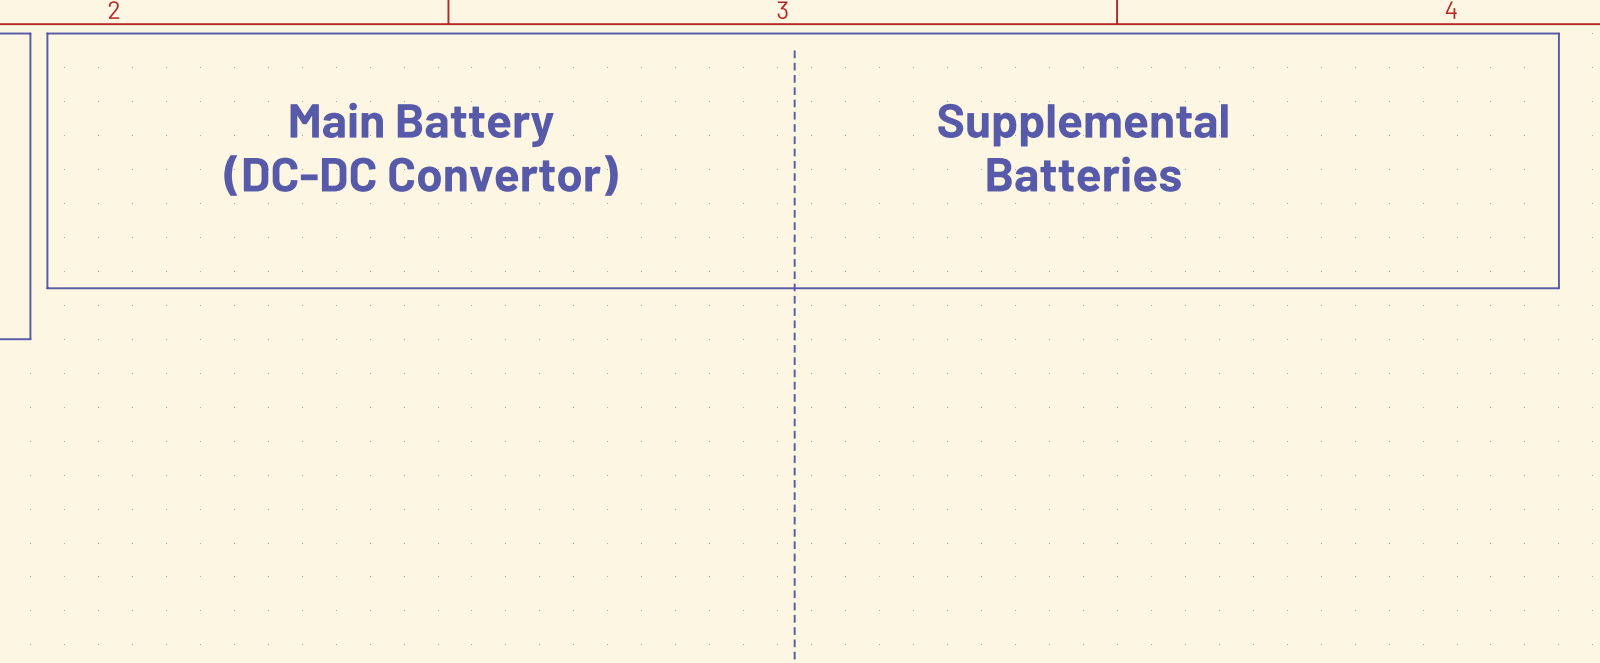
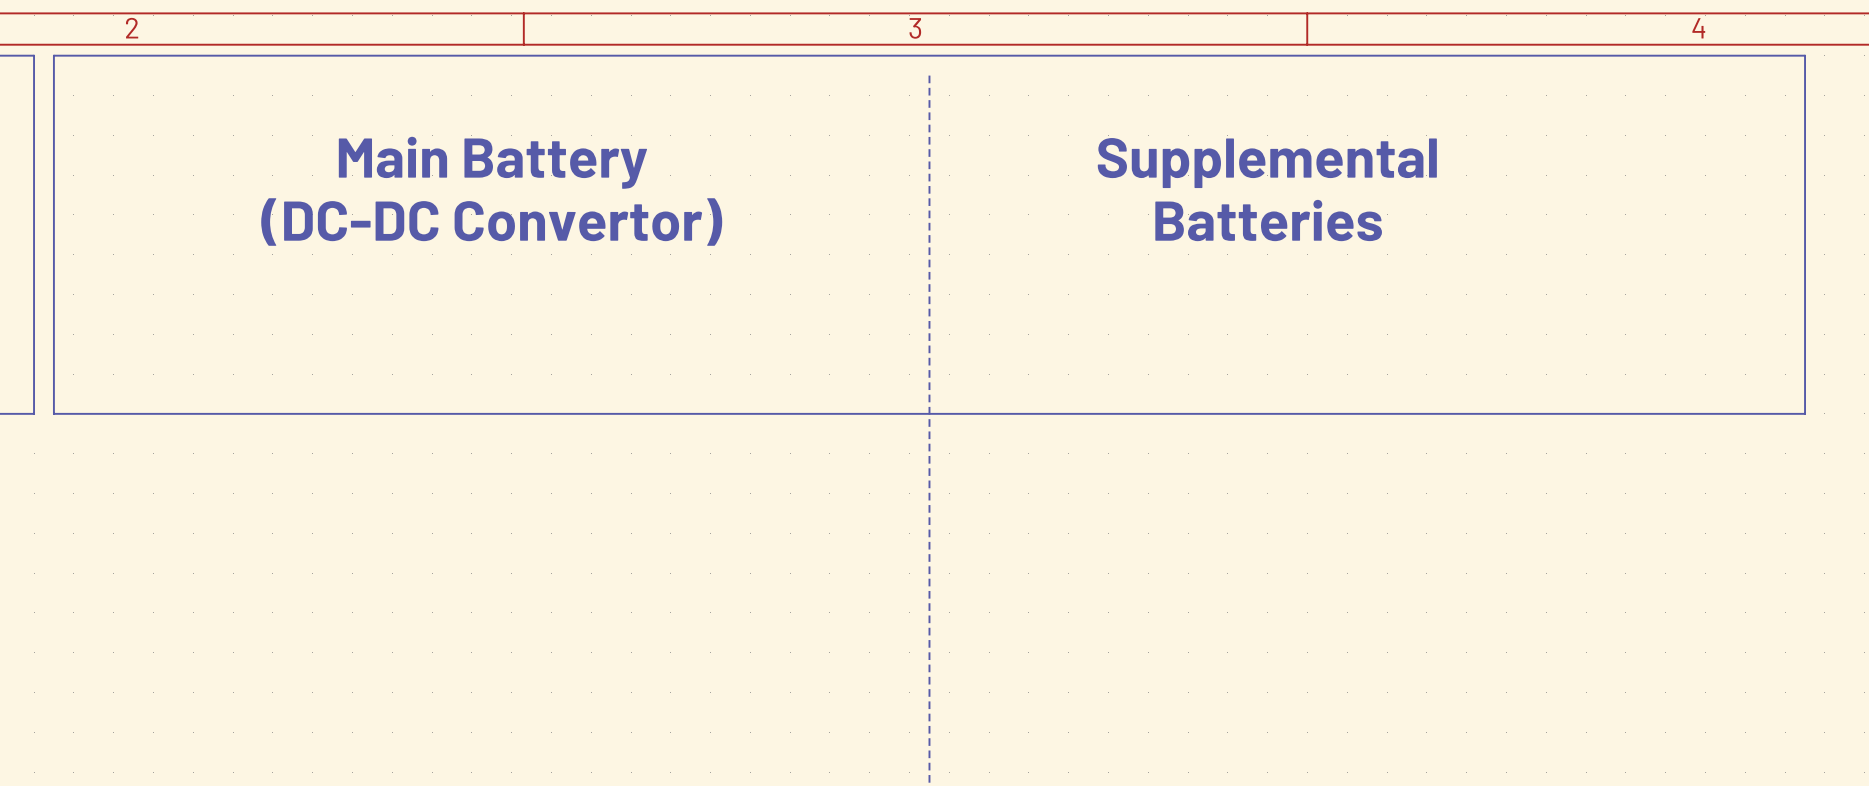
line: (1541, 33) (1558, 33) (1558, 288) (47, 288) -> (1805, 55) (1805, 413) (53, 413) (53, 354)

